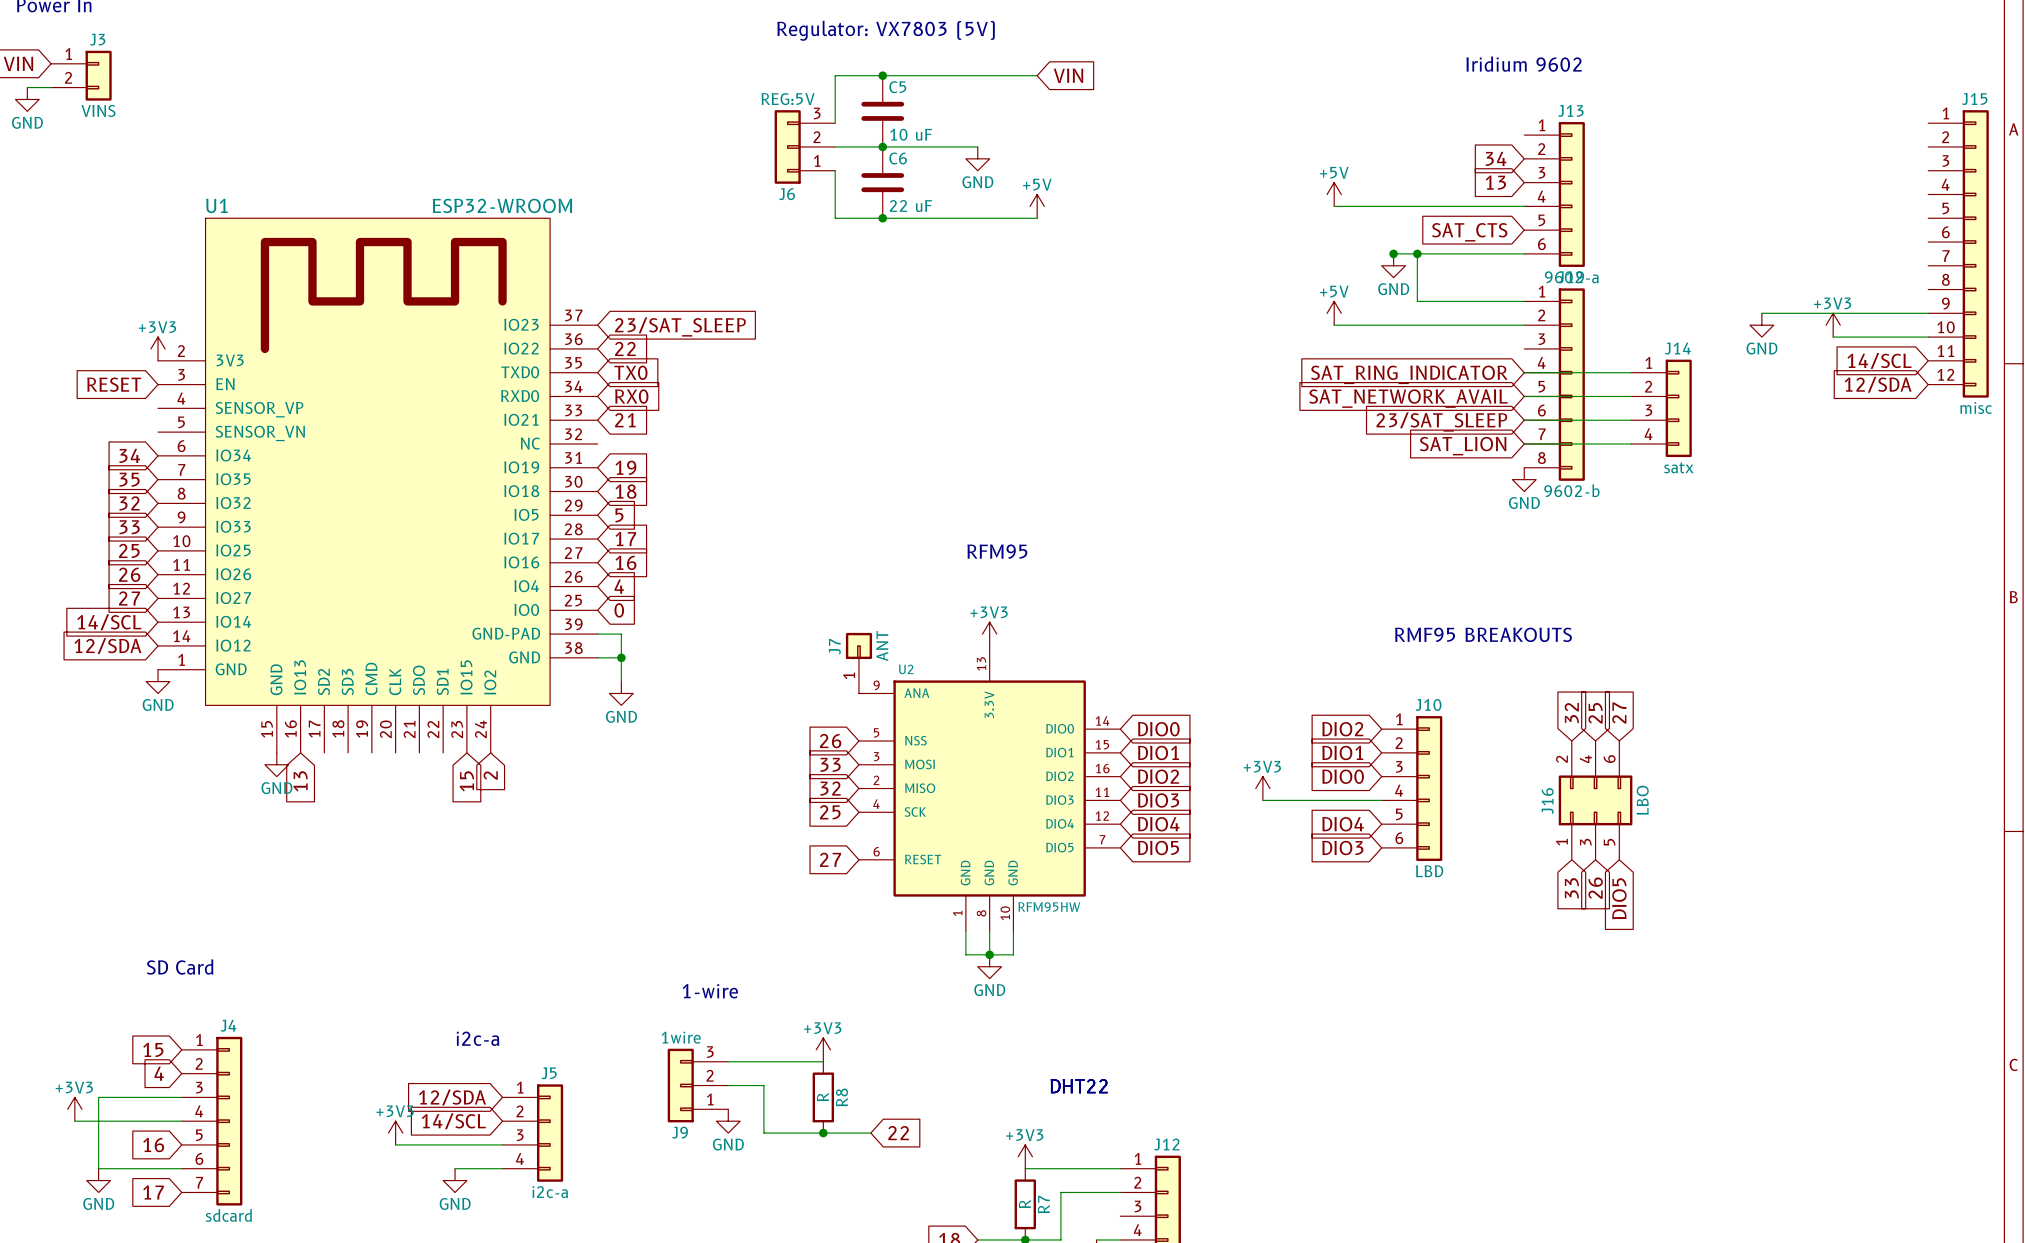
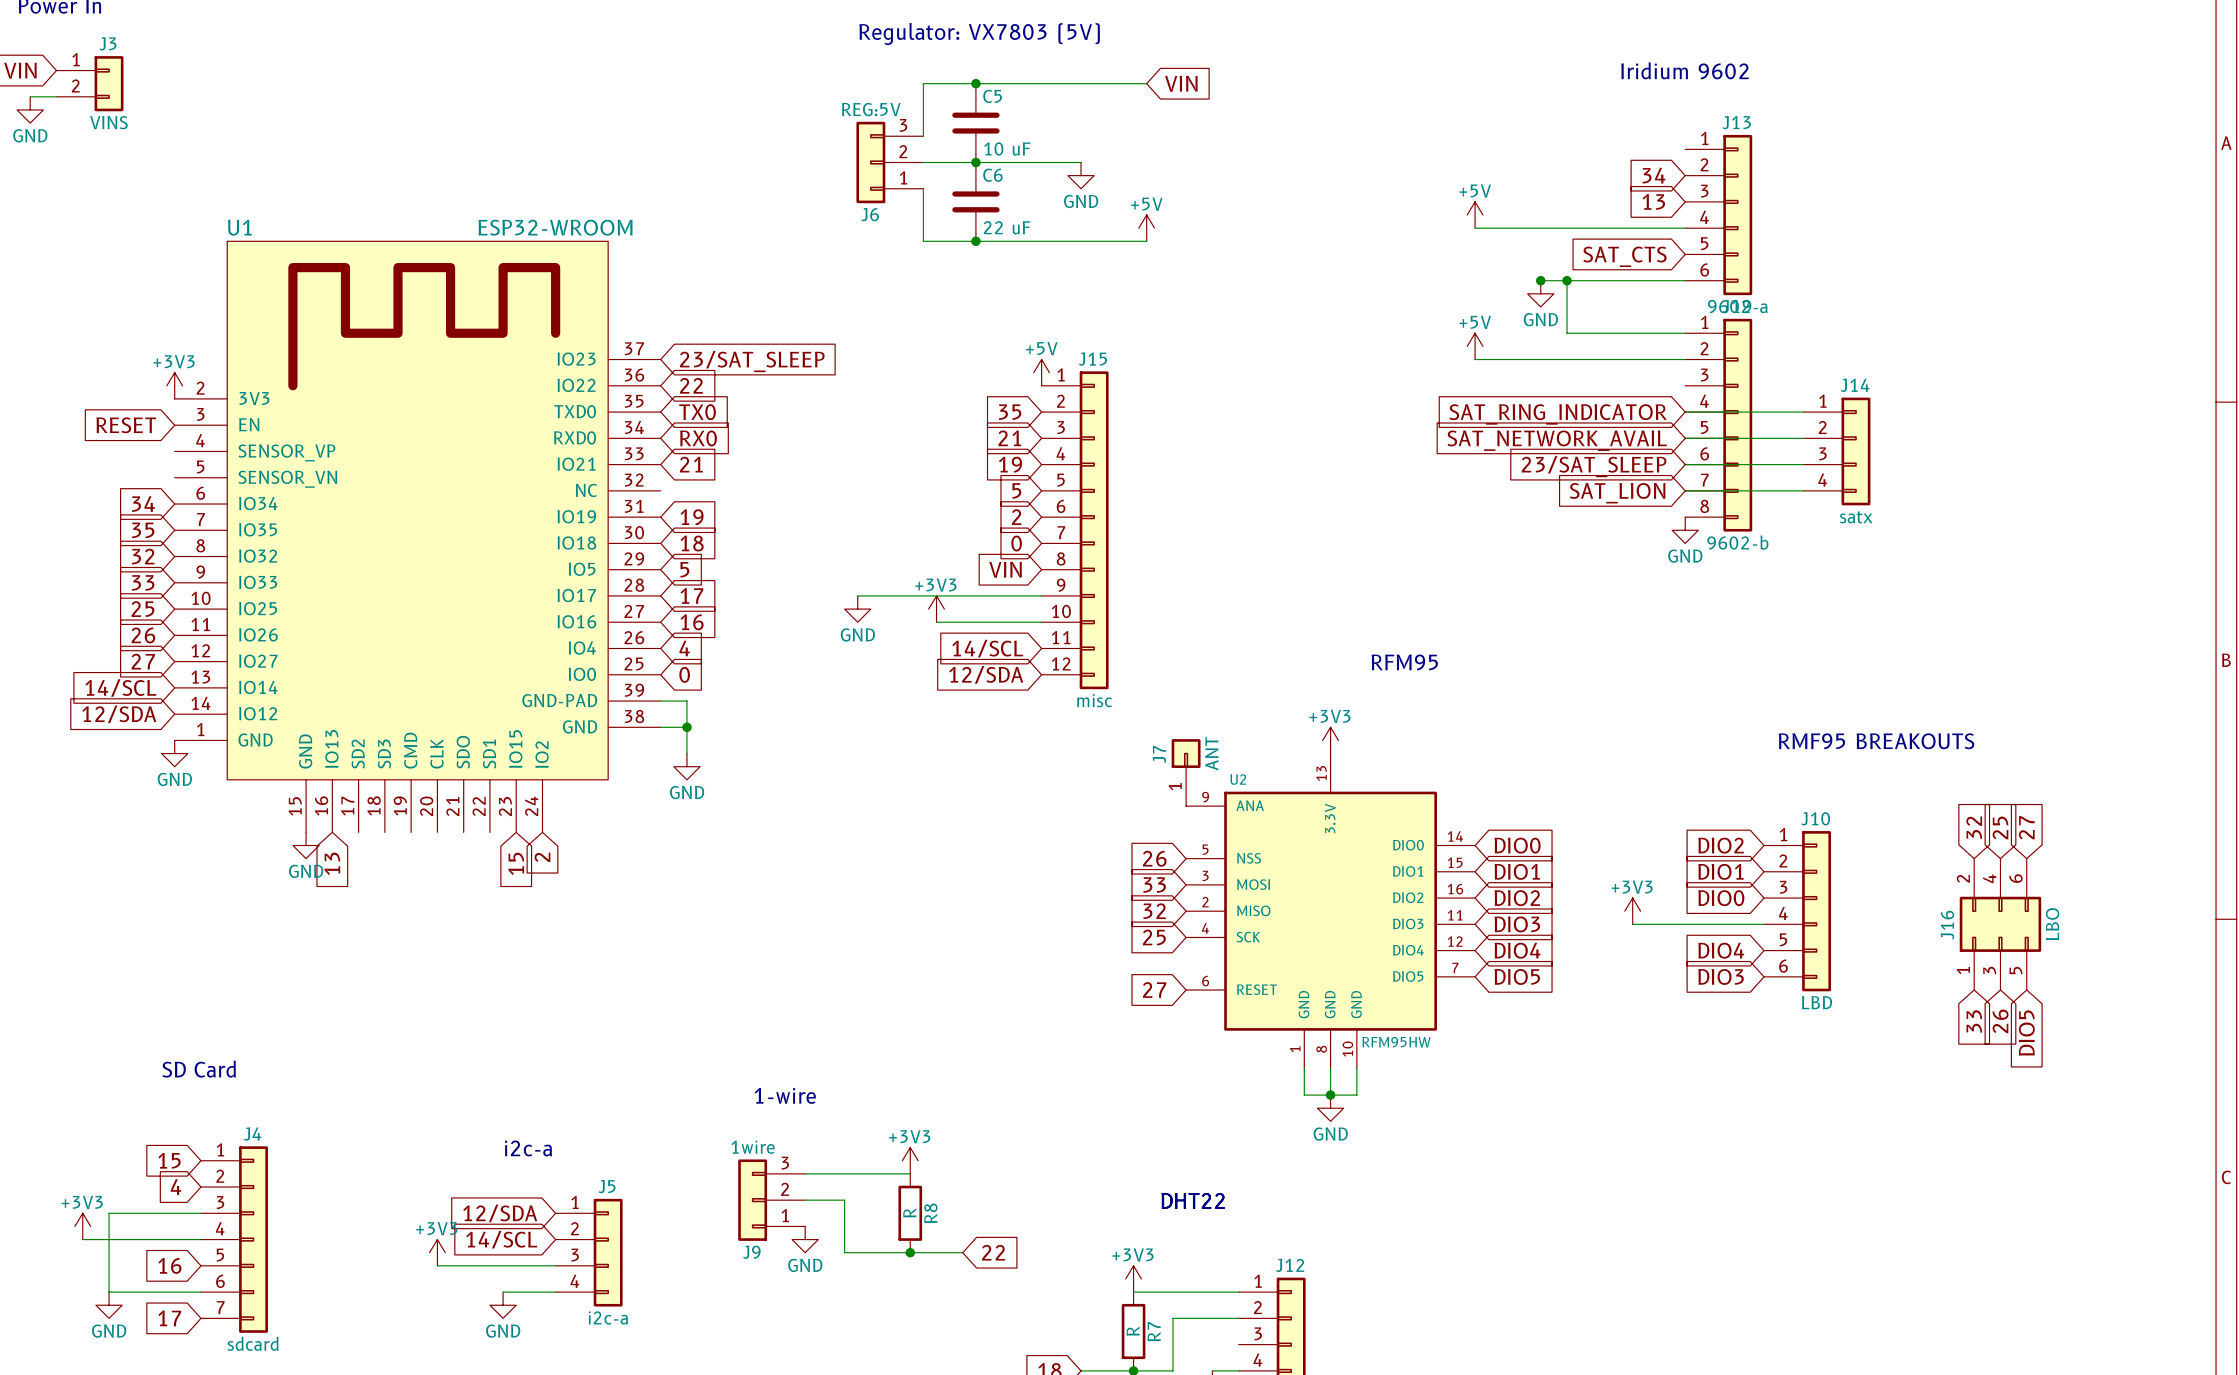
J15 position: (1958, 253) -> (1075, 530)
wire: (1761, 313) (1928, 313) -> none
power symbol: GND (1761, 325) -> none
power symbol: +3V3 (1833, 325) -> none
power symbol: none -> +5V (1041, 372)
wire: (1833, 337) (1928, 337) -> none
global label: 14/SCL (1879, 360) -> none
global label: none -> 35 (1010, 412)
global label: 12/SDA (1878, 384) -> none
global label: none -> 21 (1009, 438)
global label: none -> 19 (1010, 464)
global label: none -> 5 (1016, 490)
global label: none -> 2 (1016, 517)
global label: none -> 0 (1016, 543)
global label: none -> VIN (1005, 569)
wire: none -> (857, 595) (1041, 595)
power symbol: none -> GND (857, 609)
power symbol: none -> +3V3 (936, 609)
text: RFM95 (997, 551) -> none
wire: none -> (936, 622) (1041, 622)
global label: none -> 14/SCL (987, 648)
text: none -> RFM95 (1404, 662)
global label: none -> 12/SDA (986, 674)
power symbol: +3V3 (989, 634) -> none
text position: RMF95 BREAKOUTS (1483, 634) -> RMF95 BREAKOUTS (1876, 741)
J7 position: (858, 663) -> (1186, 772)
power symbol: none -> +3V3 (1330, 740)
global label position: 32 (1571, 712) -> 32 (1974, 827)
global label position: 25 (1595, 713) -> 25 (2000, 827)
global label position: 27 (1619, 713) -> 27 (2026, 827)
global label: DIO0 (1158, 729) -> none
global label rotation: 0° (1342, 729) -> 180° (1517, 898)
global label position: 26 (830, 741) -> 26 (1154, 858)
global label: DIO1 (1158, 752) -> none
global label rotation: 0° (1342, 752) -> 180° (1517, 871)
global label position: 33 (830, 764) -> 33 (1154, 885)
global label: none -> DIO2 (1721, 845)
global label: DIO2 (1158, 776) -> none
global label rotation: 0° (1343, 776) -> 180° (1517, 845)
global label position: 32 (830, 788) -> 32 (1154, 911)
U2 position: (989, 788) -> (1330, 911)
power symbol: +3V3 (1262, 788) -> none
J10 position: (1412, 788) -> (1797, 911)
global label: none -> DIO1 (1721, 871)
global label: DIO3 (1158, 800) -> none
wire: (1262, 800) (1381, 800) -> (1632, 924) (1764, 924)
J16 position: (1595, 800) -> (2000, 924)
global label position: 25 (830, 812) -> 25 (1154, 937)
global label: none -> DIO0 (1721, 898)
global label: DIO4 (1158, 824) -> none
global label rotation: 0° (1343, 824) -> 180° (1517, 950)
power symbol: none -> +3V3 (1632, 911)
global label: DIO5 (1158, 848) -> none
global label rotation: 0° (1342, 848) -> 180° (1517, 924)
global label position: 27 (830, 859) -> 27 (1154, 990)
global label: none -> DIO5 (1517, 976)
global label: none -> DIO3 (1721, 976)
global label position: 33 (1571, 888) -> 33 (1974, 1021)
global label: 26 (1595, 888) -> DIO4 (1721, 950)
global label: DIO5 (1619, 898) -> none
global label: none -> 26 (2000, 1021)
wire: (965, 931) (965, 954) (1013, 954) (1013, 931) -> (1304, 1068) (1304, 1095) (1356, 1095) (1356, 1068)
wire: (989, 931) (989, 954) -> (1330, 1068) (1330, 1095)
global label: none -> DIO5 (2026, 1033)
junction: (989, 954) -> none
power symbol position: GND (989, 966) -> GND (1330, 1108)
junction: none -> (1330, 1095)

